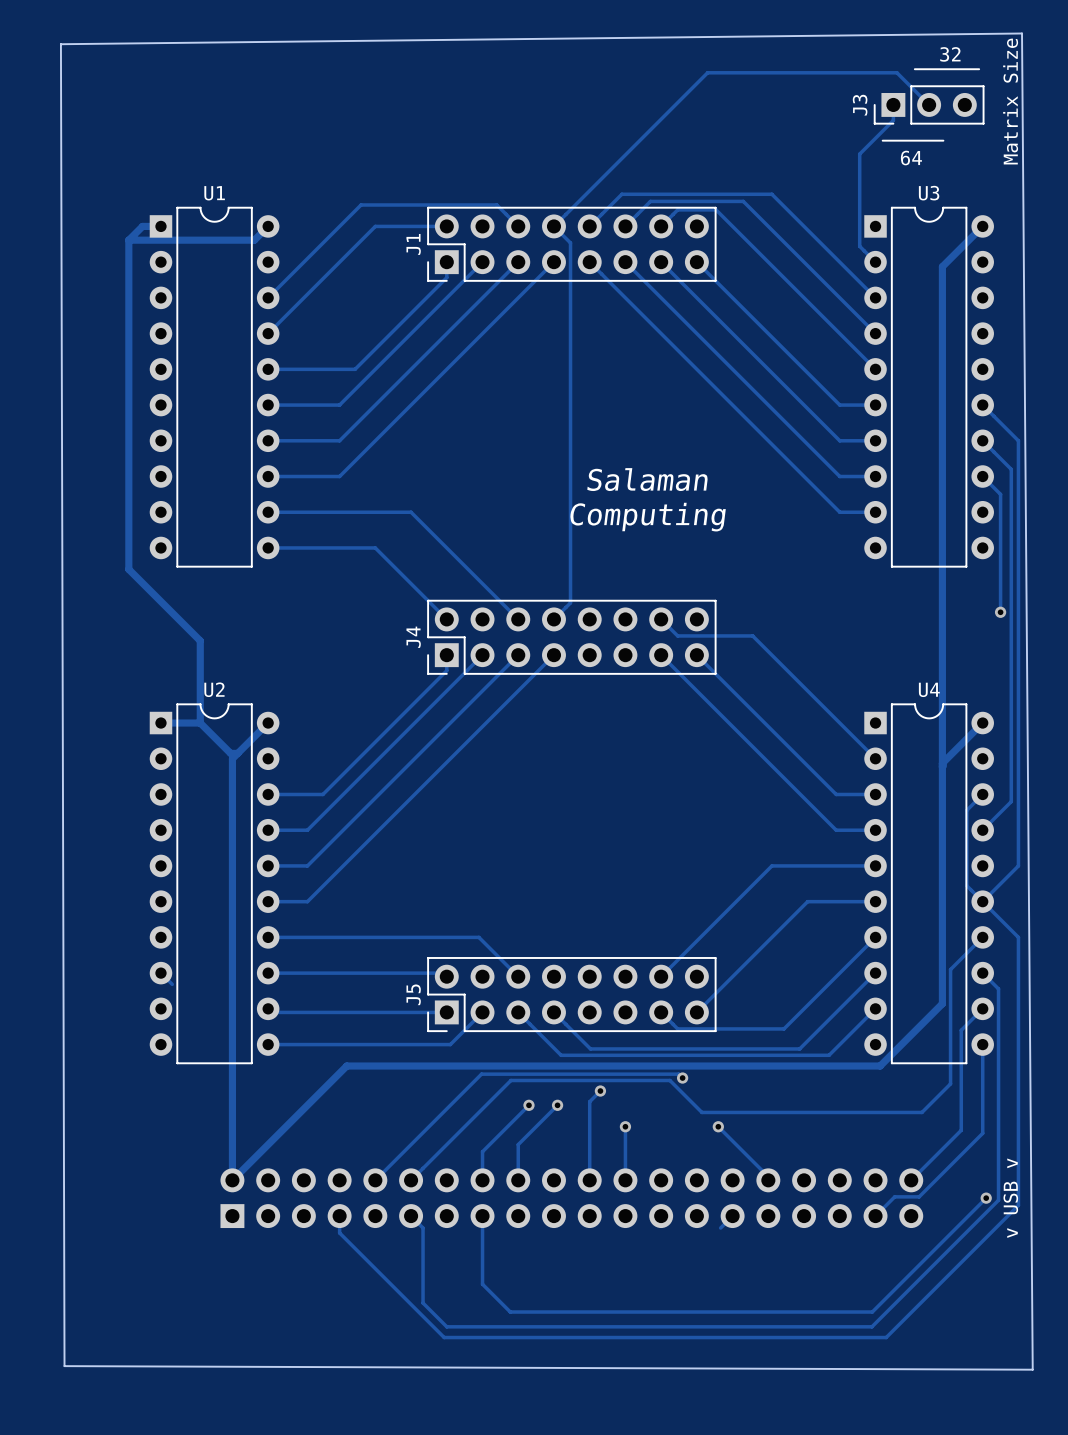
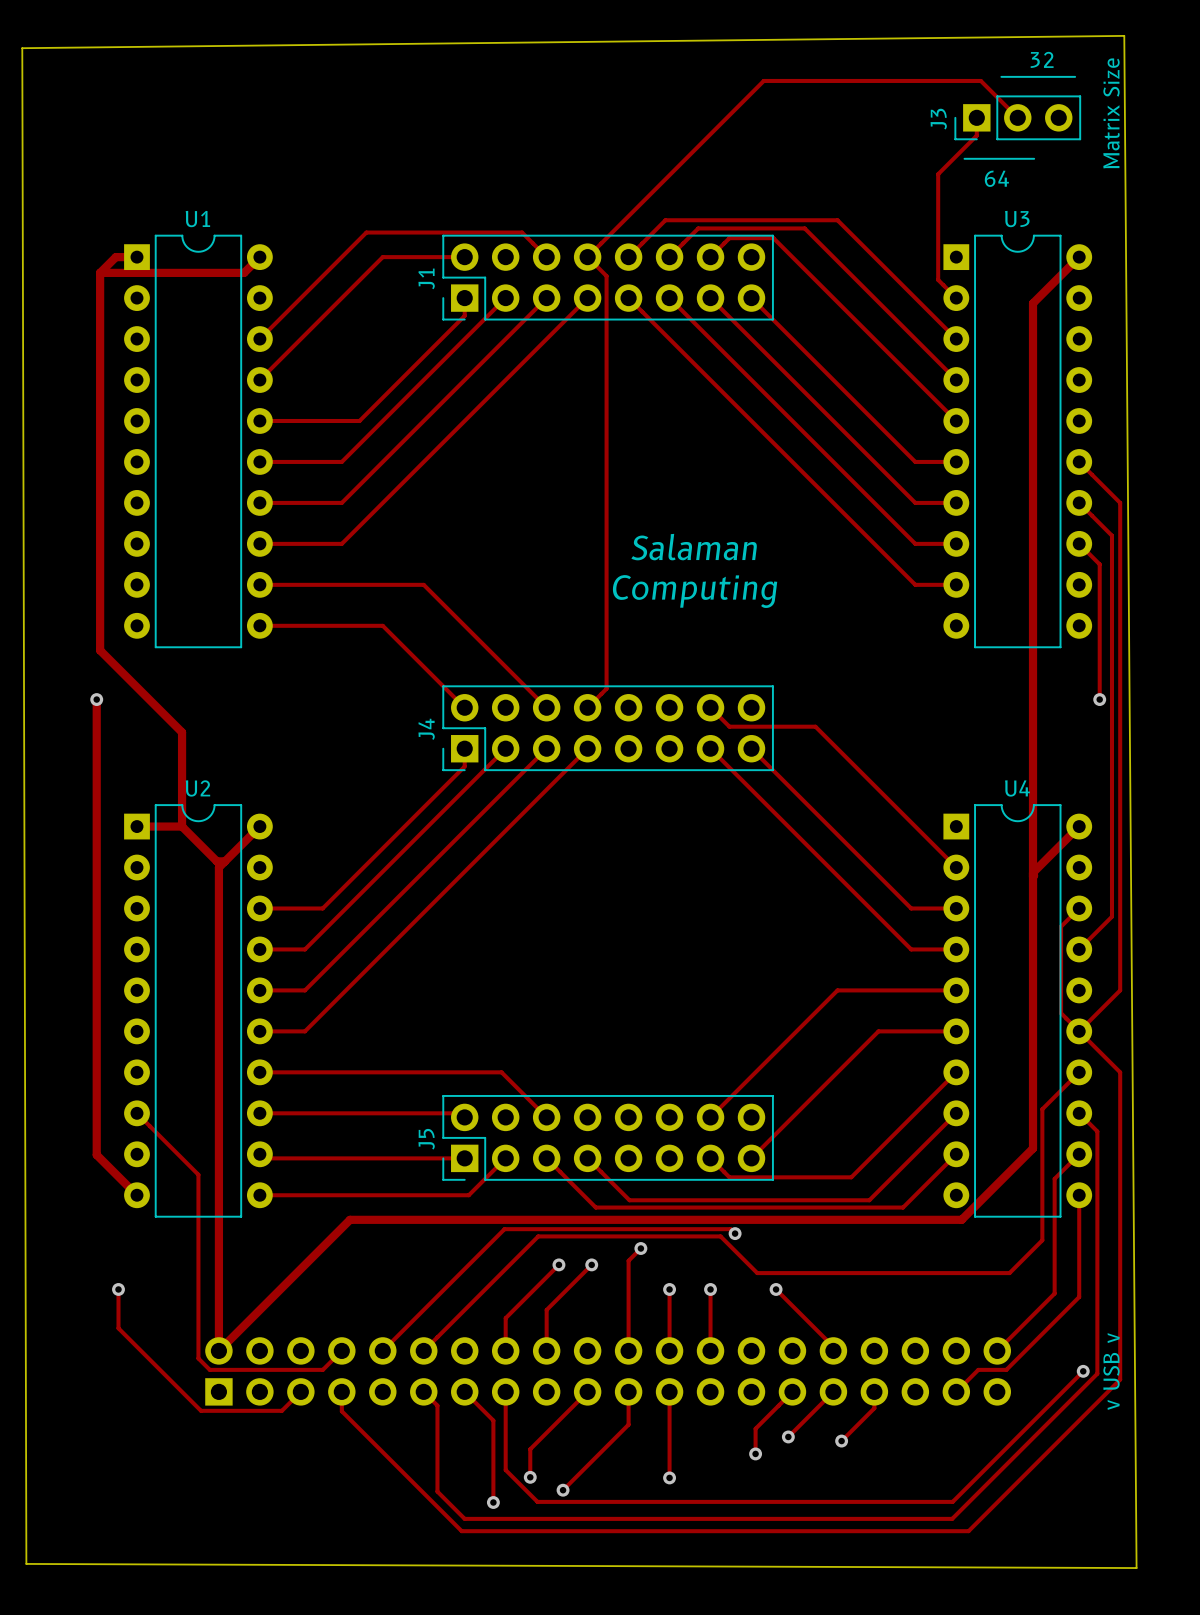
track: none -> (96, 699) (96, 1154) (136, 1195)
via: none -> (96, 699)
track: none -> (149, 1126) (198, 1174) (198, 1358) (209, 1369) (322, 1369) (341, 1350)
track: none -> (118, 1289) (118, 1328) (201, 1410) (281, 1410) (300, 1391)
via: none -> (118, 1289)
track: none -> (710, 1289) (710, 1350)
via: none -> (710, 1289)
track: none -> (464, 1391) (493, 1420) (493, 1502)
track: none -> (587, 1391) (530, 1449) (530, 1477)
track: none -> (628, 1391) (628, 1424) (563, 1490)
track: none -> (669, 1391) (669, 1477)
track: none -> (833, 1391) (788, 1436)
track: none -> (874, 1391) (874, 1408) (841, 1441)
track: none -> (778, 1405) (755, 1428) (755, 1453)
via: none -> (788, 1436)
via: none -> (841, 1441)
via: none -> (755, 1453)
via: none -> (530, 1477)
via: none -> (669, 1477)
via: none -> (563, 1490)
via: none -> (493, 1502)

